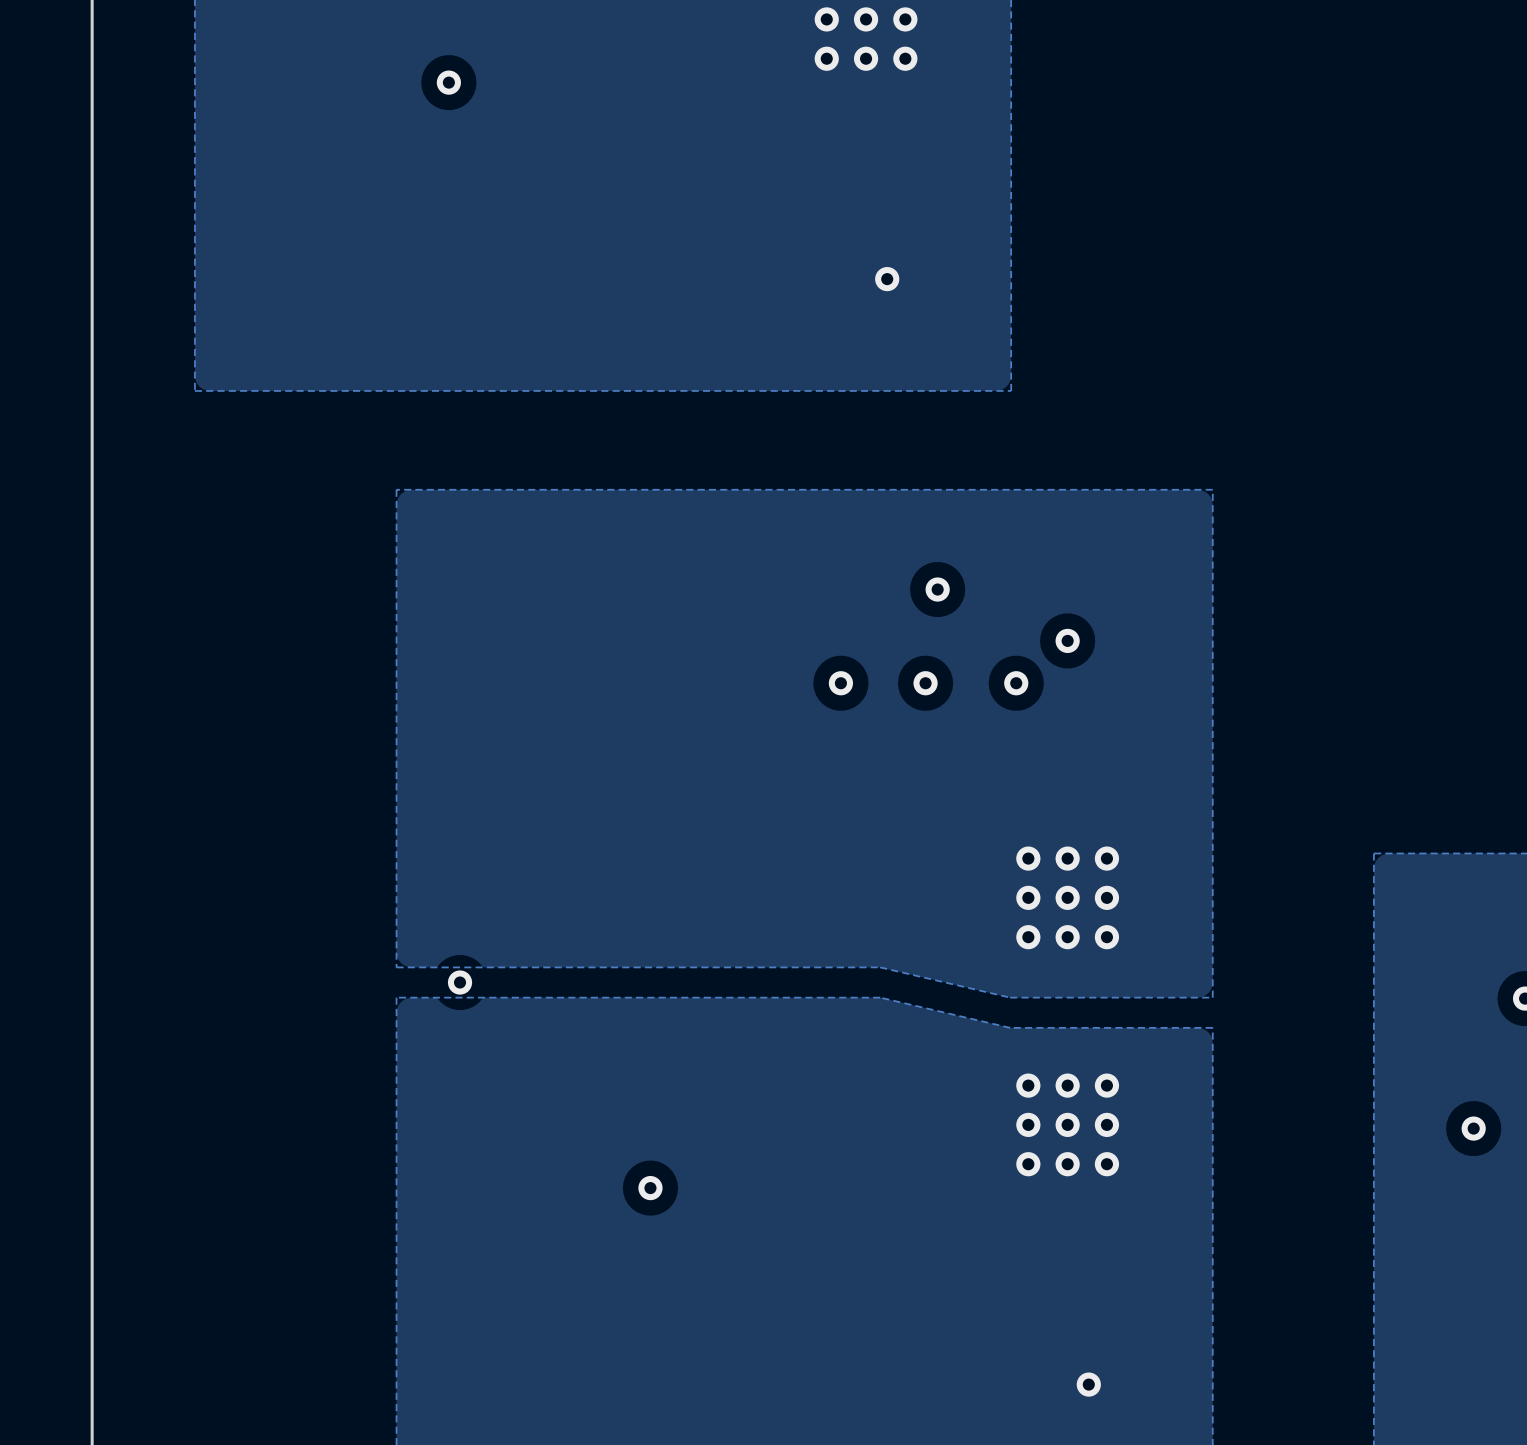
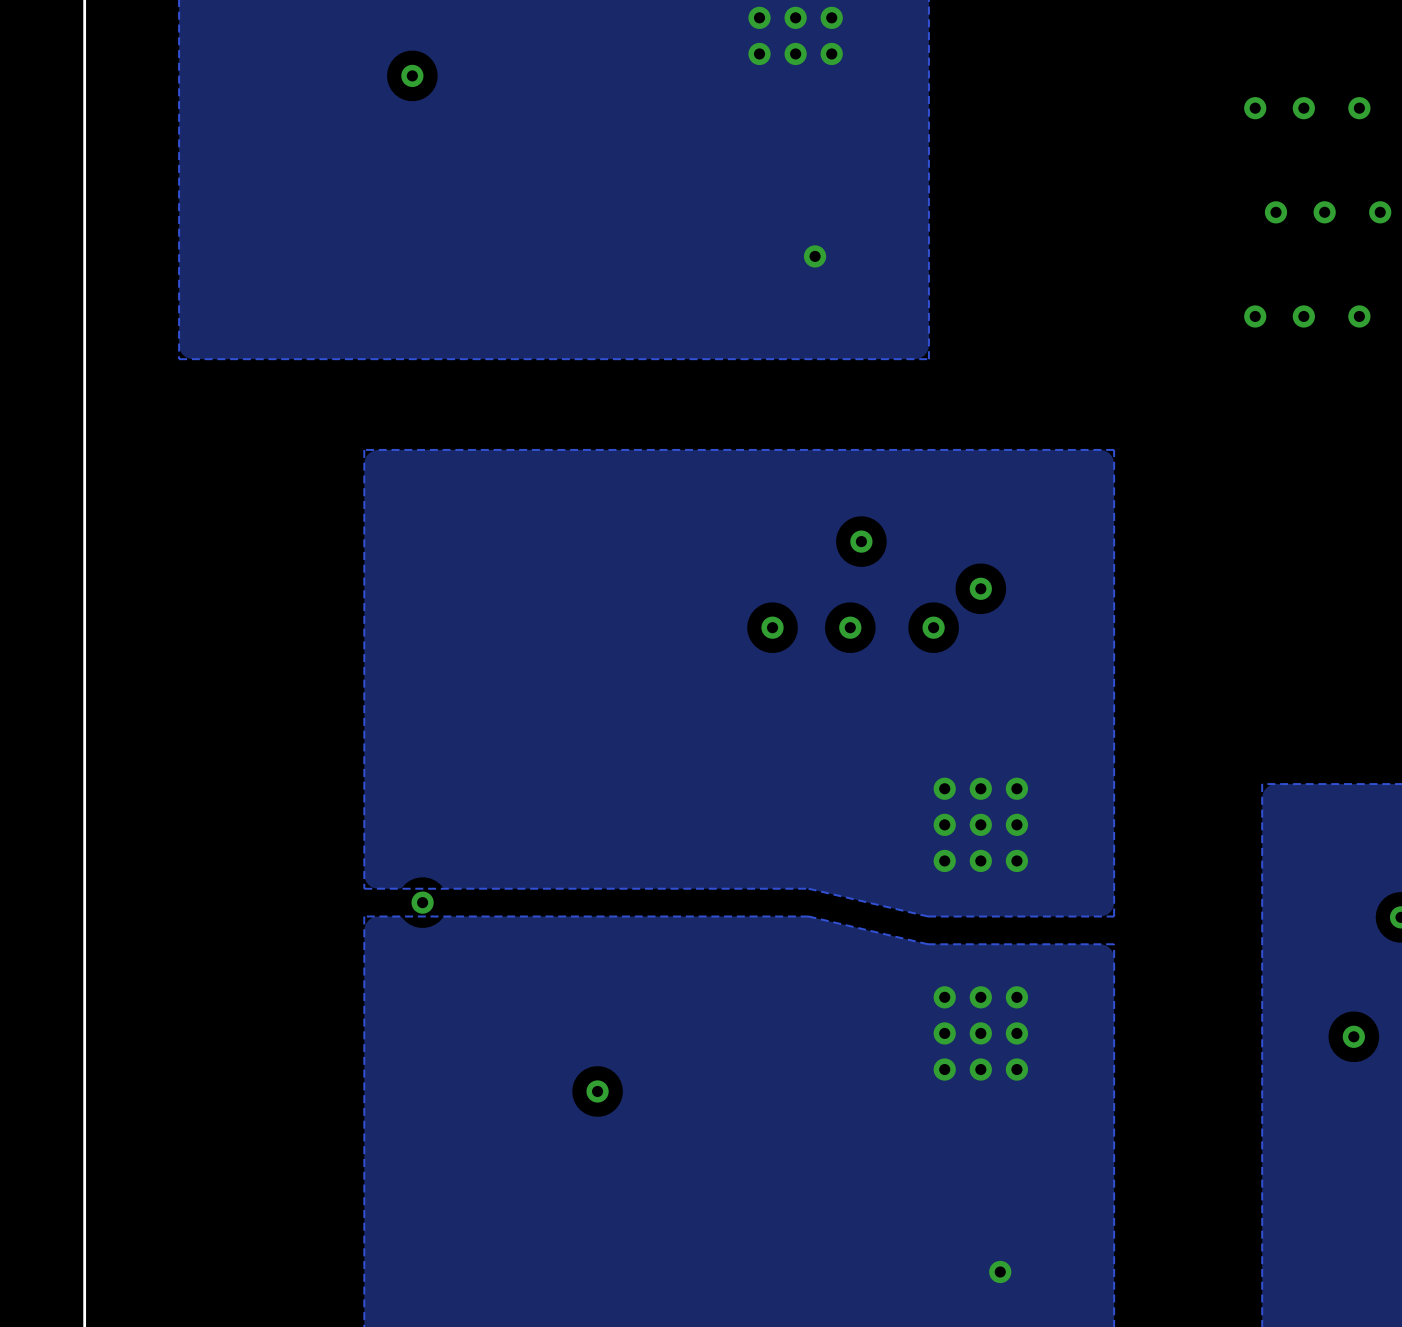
via: none -> (1255, 108)
via: none -> (1303, 108)
via: none -> (1359, 108)
via: none -> (1276, 212)
via: none -> (1324, 212)
via: none -> (1380, 212)
via: none -> (1255, 316)
via: none -> (1303, 316)
via: none -> (1359, 316)

